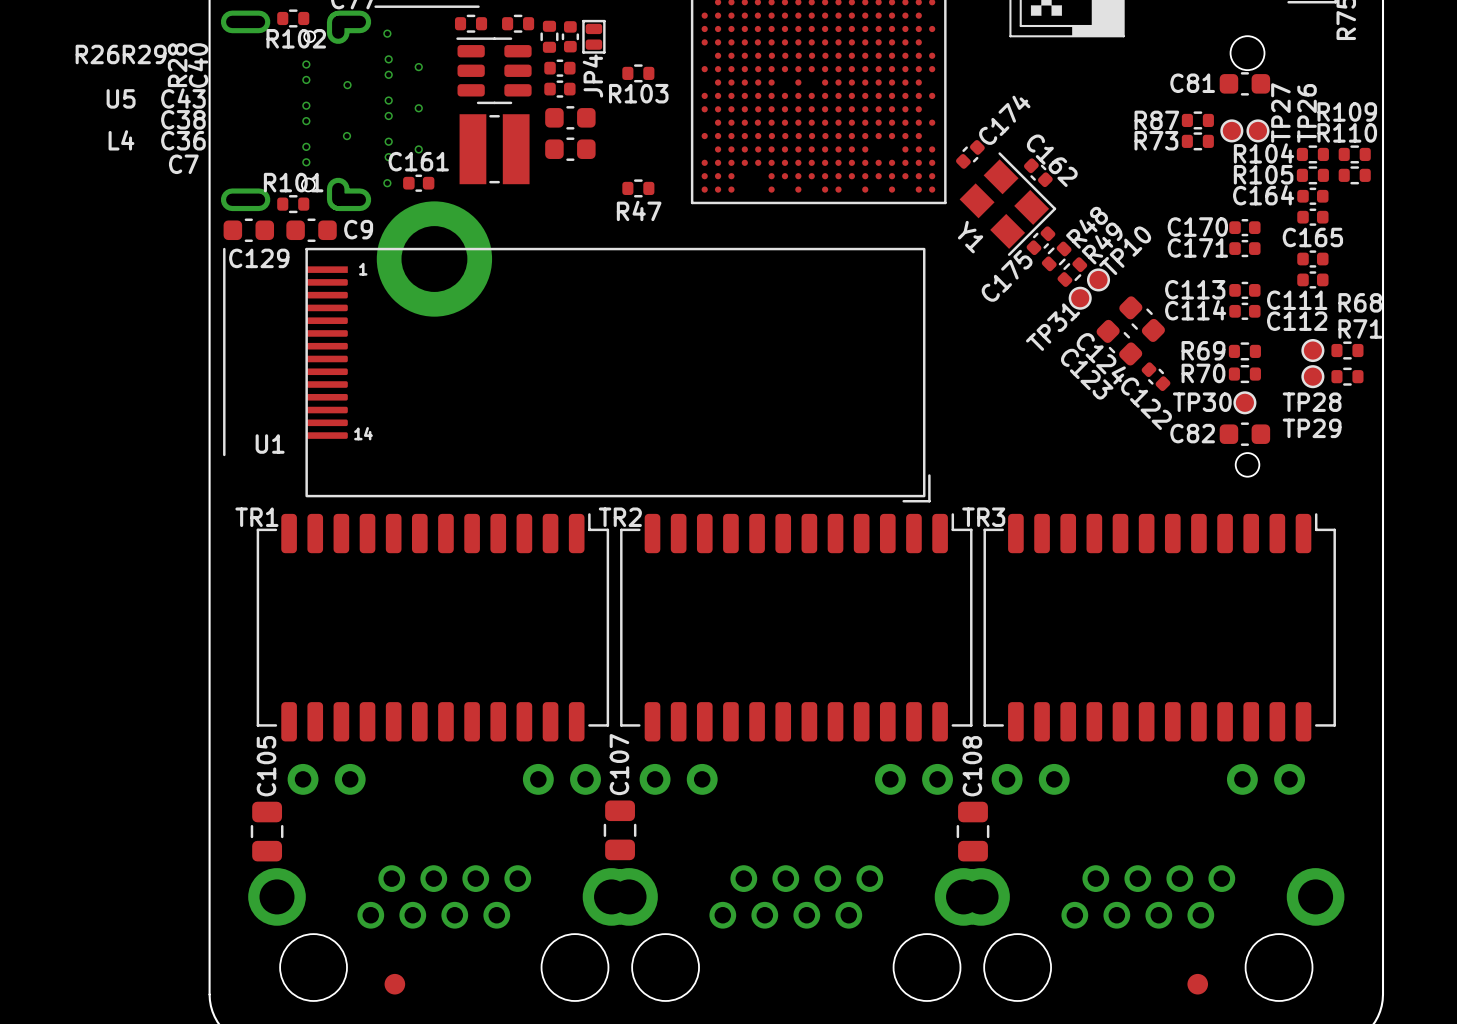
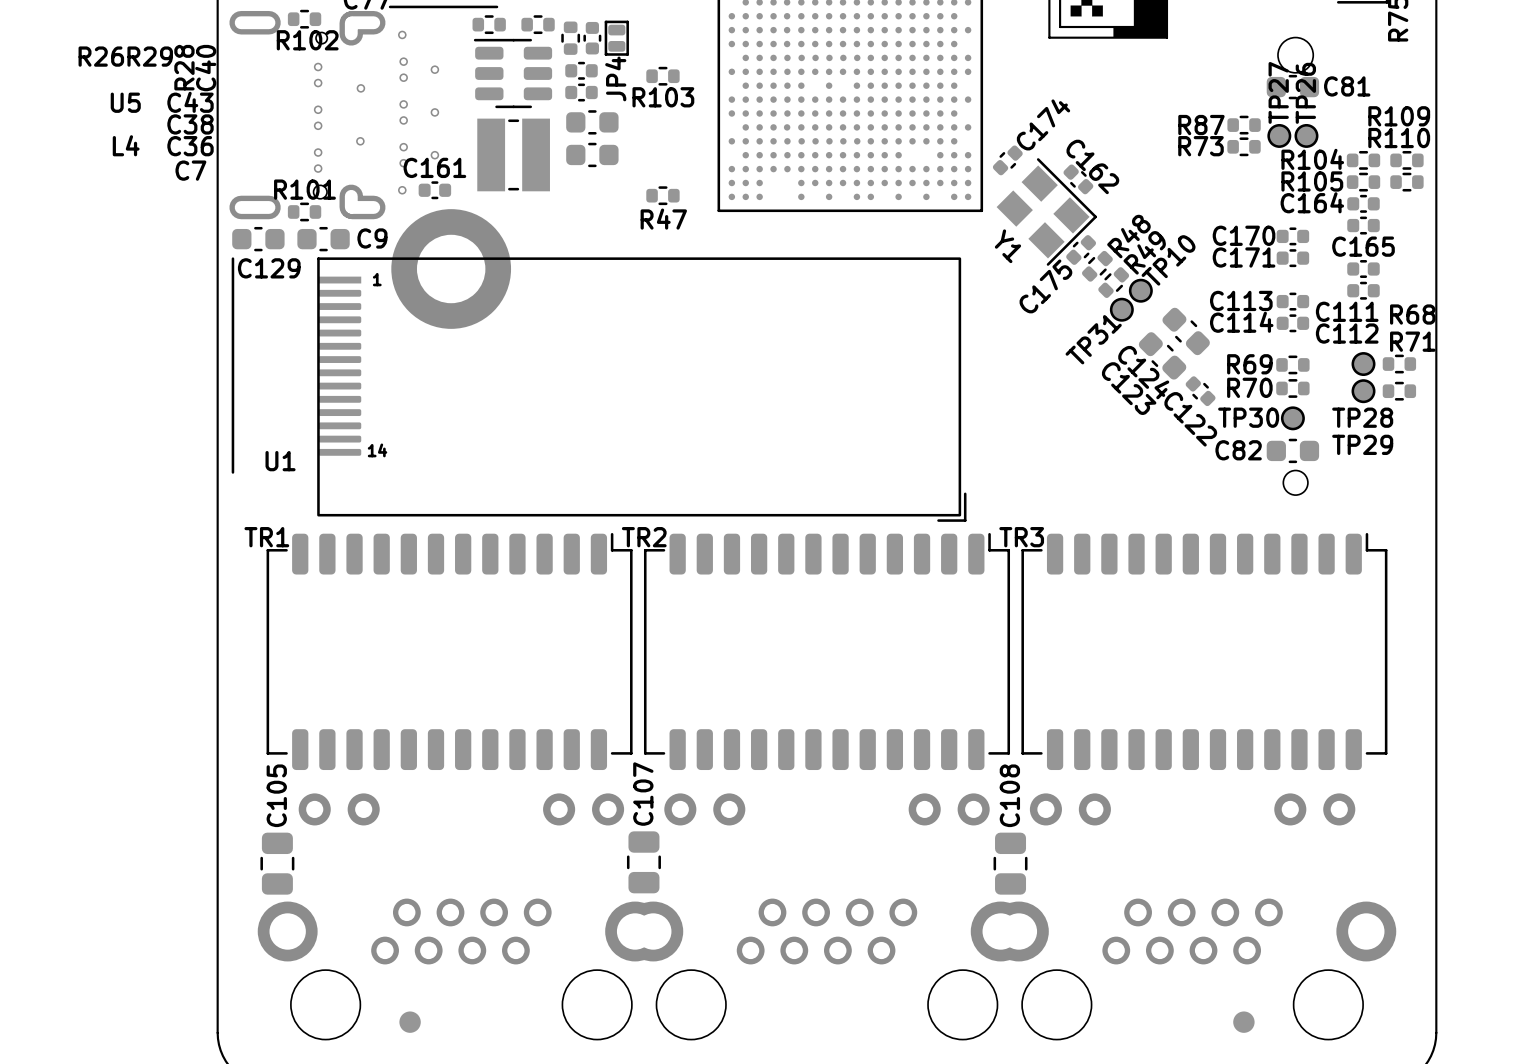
C81 name position: C81 (1192, 83) -> C81 (1347, 86)
TP27 name position: TP27 (1280, 112) -> TP27 (1278, 92)
TP26 name position: TP26 (1307, 113) -> TP26 (1305, 93)

